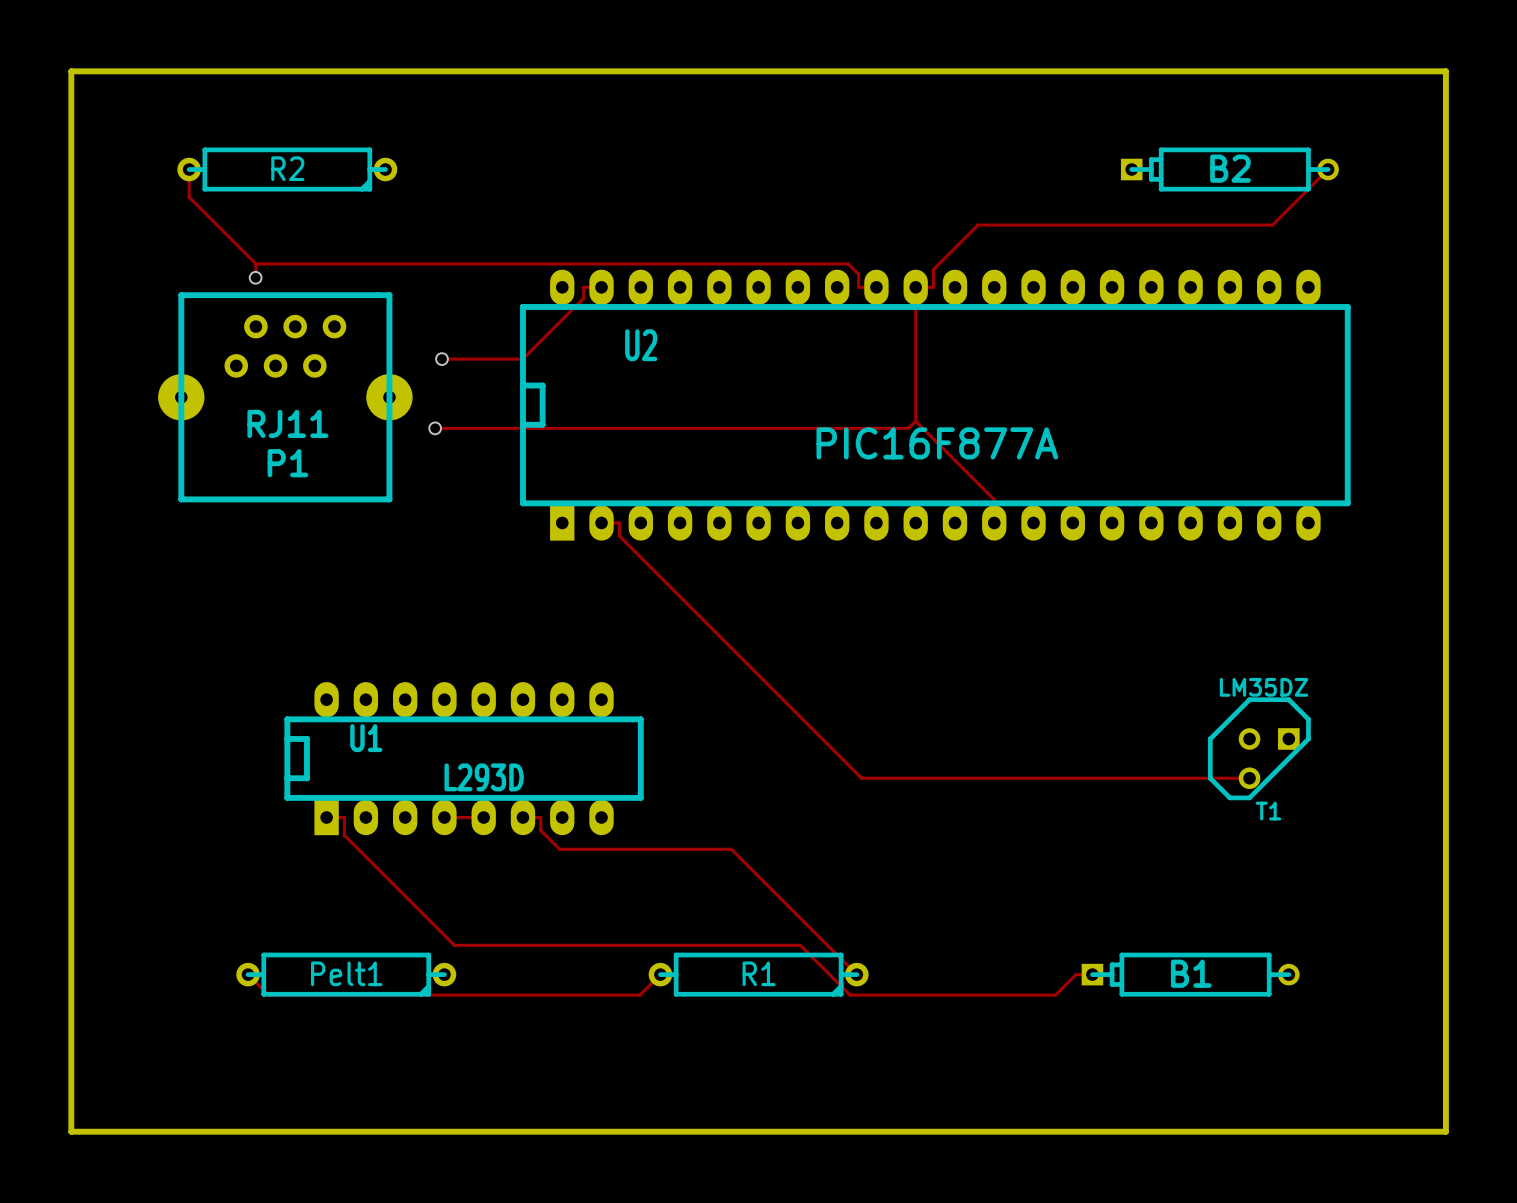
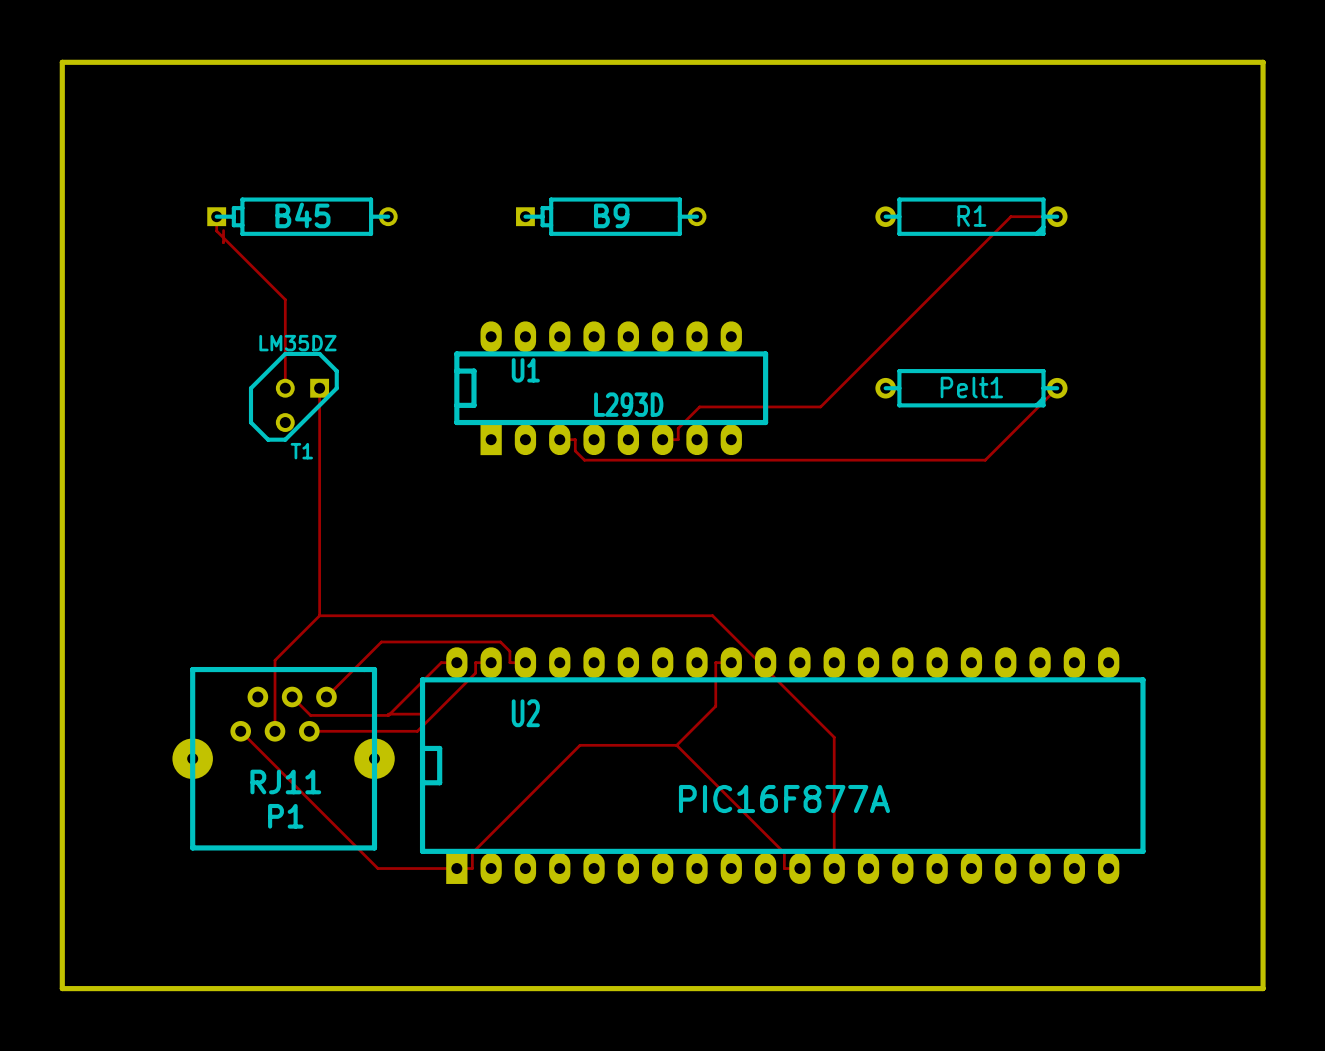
track: (189, 169) (189, 197) (255, 263) (848, 263) (858, 274) (858, 287) (876, 287) -> none
R2: (287, 169) -> none
B2: (1229, 169) -> none
track: (1328, 169) (1272, 225) (977, 225) (933, 269) (933, 287) (915, 287) (915, 421) -> none
track: none -> (216, 216) (216, 231) (285, 299) (285, 388)
B45: none -> (302, 216)
B9: none -> (611, 216)
track: none -> (1057, 216) (1010, 216) (820, 406) (699, 406) (678, 428) (678, 439) (662, 439)
via: (255, 277) -> none
track: (601, 287) (583, 287) (583, 298) (522, 359) (441, 359) -> none
via: (441, 359) -> none
P1 position: (285, 397) -> (283, 758)
U2 position: (935, 405) -> (782, 765)
track: (915, 421) (994, 499) (994, 522) -> none
track: (915, 421) (908, 428) (435, 428) -> none
via: (435, 428) -> none
track: none -> (319, 388) (319, 615)
track: none -> (1057, 388) (985, 460) (584, 460) (575, 450) (575, 439) (559, 439)
track: (601, 522) (619, 522) (619, 535) (861, 778) (1249, 778) -> none
track: none -> (319, 615) (275, 660) (275, 731)
track: none -> (319, 615) (712, 615) (834, 737) (834, 868)
T1 position: (1259, 748) -> (293, 396)
U1 position: (464, 758) -> (611, 388)
track: none -> (456, 662) (441, 662) (388, 715) (310, 715) (292, 696)
track: none -> (491, 662) (475, 662) (475, 673) (417, 731) (309, 731)
track: none -> (525, 662) (509, 662) (509, 651) (500, 641) (381, 641) (326, 696)
track: none -> (731, 662) (715, 662) (715, 706) (676, 745)
track: (326, 817) (344, 817) (344, 835) (454, 945) (800, 945) (850, 995) (1055, 995) (1076, 974) (1092, 974) -> none
track: (522, 817) (540, 817) (540, 830) (559, 849) (731, 849) (856, 974) -> none
track: none -> (240, 731) (377, 868) (472, 868) (472, 852) (580, 745) (676, 745)
track: none -> (676, 745) (784, 852) (784, 868) (799, 868)
track: (248, 974) (268, 995) (639, 995) (660, 974) -> none
Pelt1 position: (346, 974) -> (971, 388)
R1 position: (758, 974) -> (971, 216)
B1: (1190, 974) -> none

